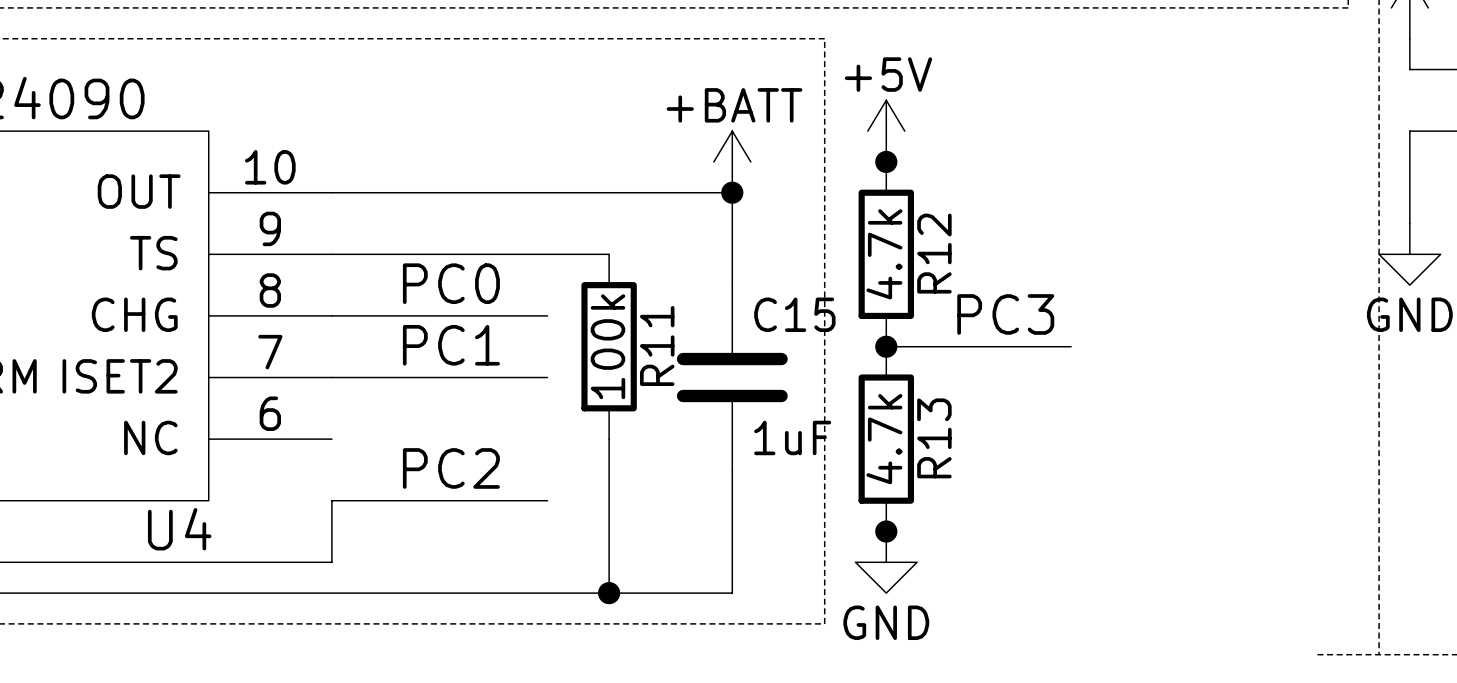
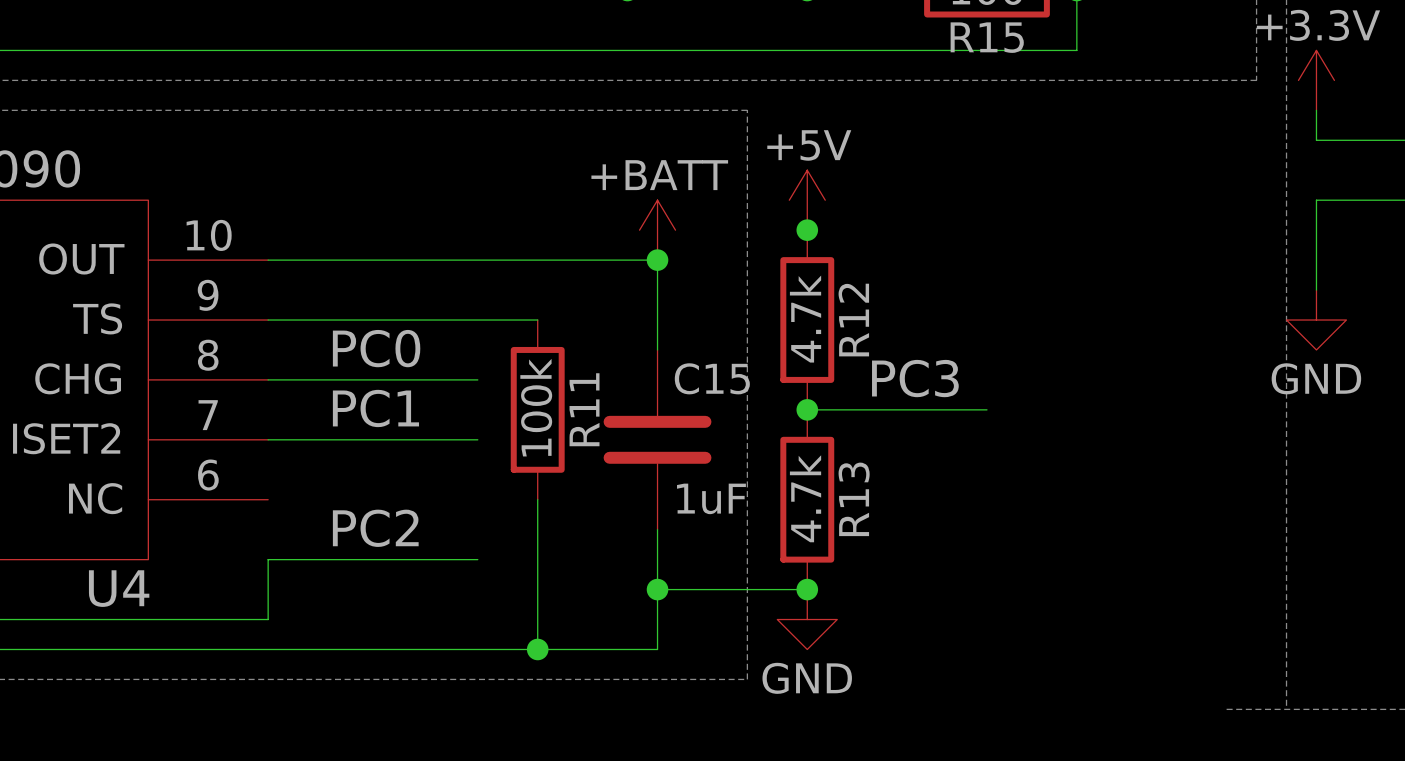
wire: none -> (657, 589) (807, 589)
junction: none -> (657, 589)

